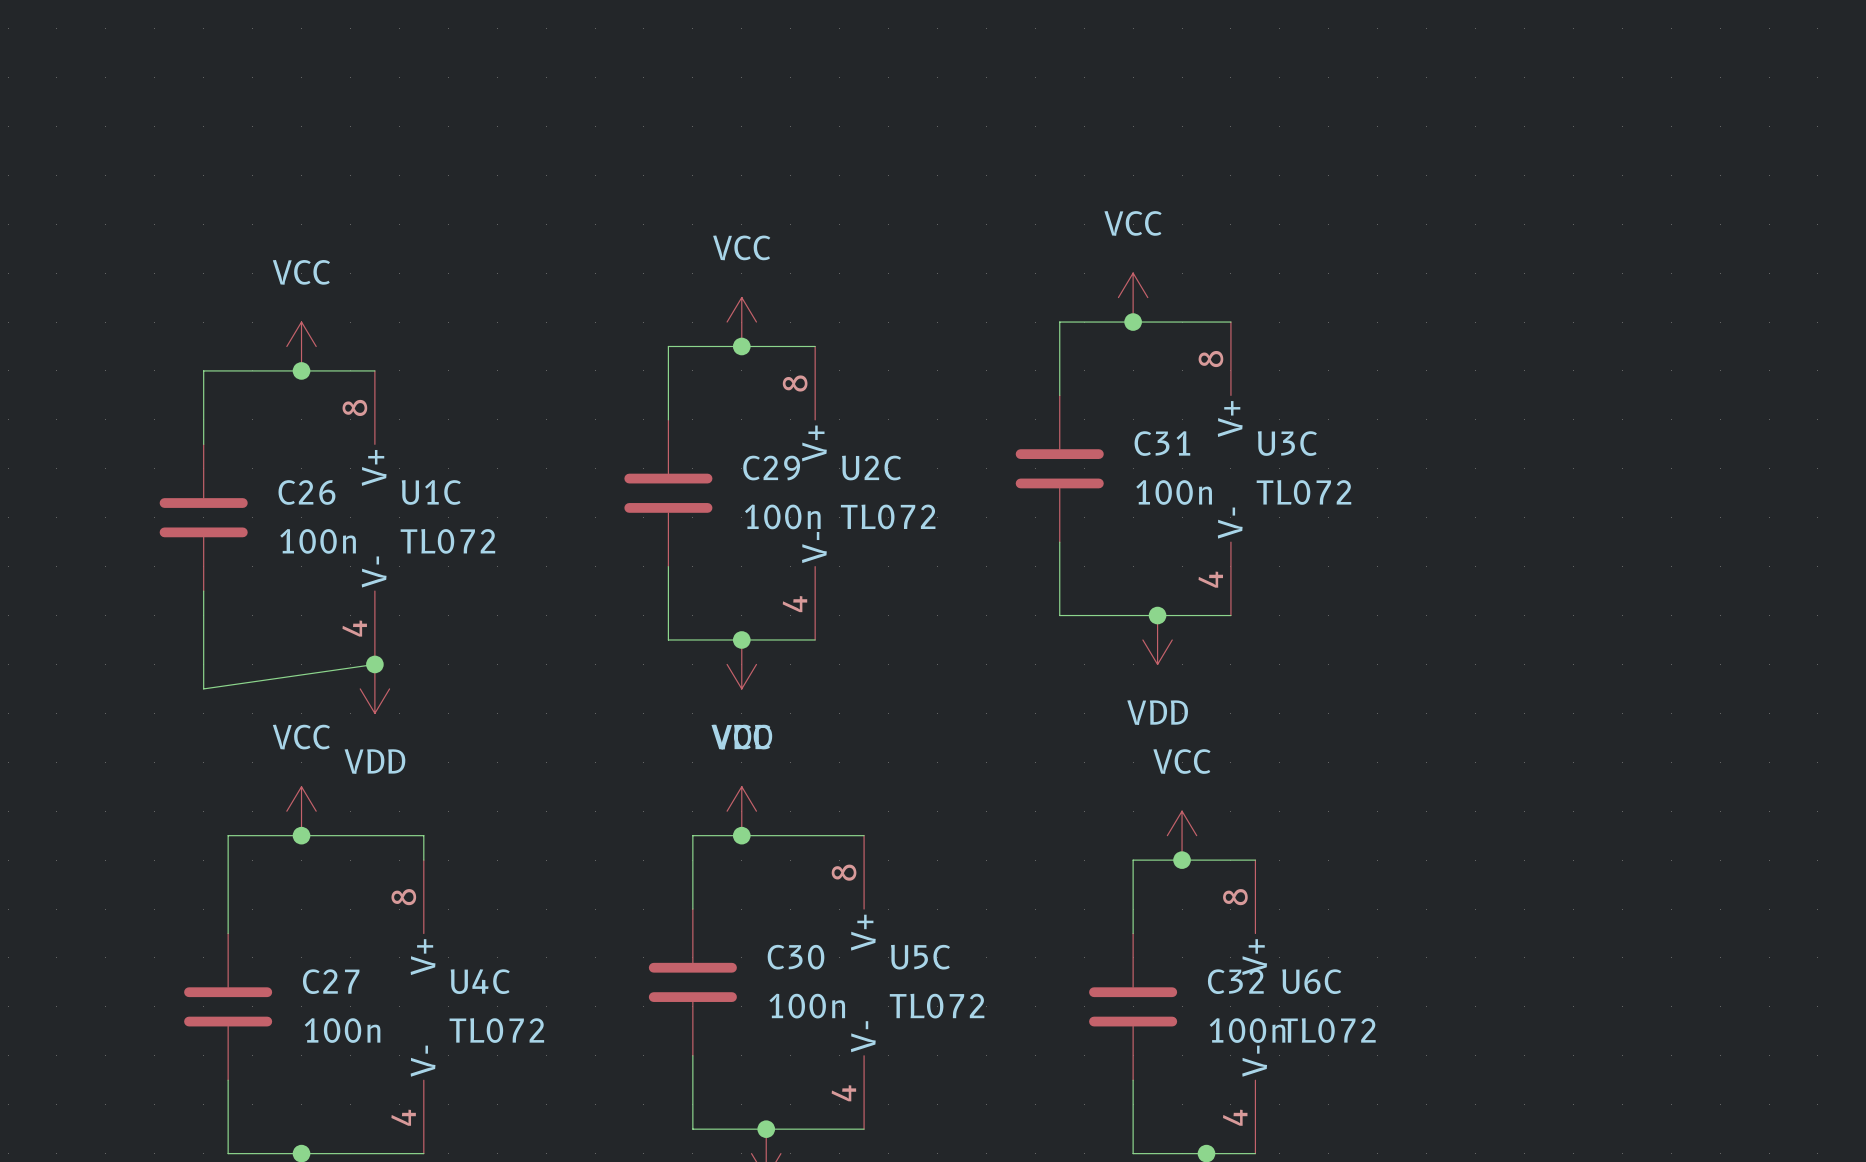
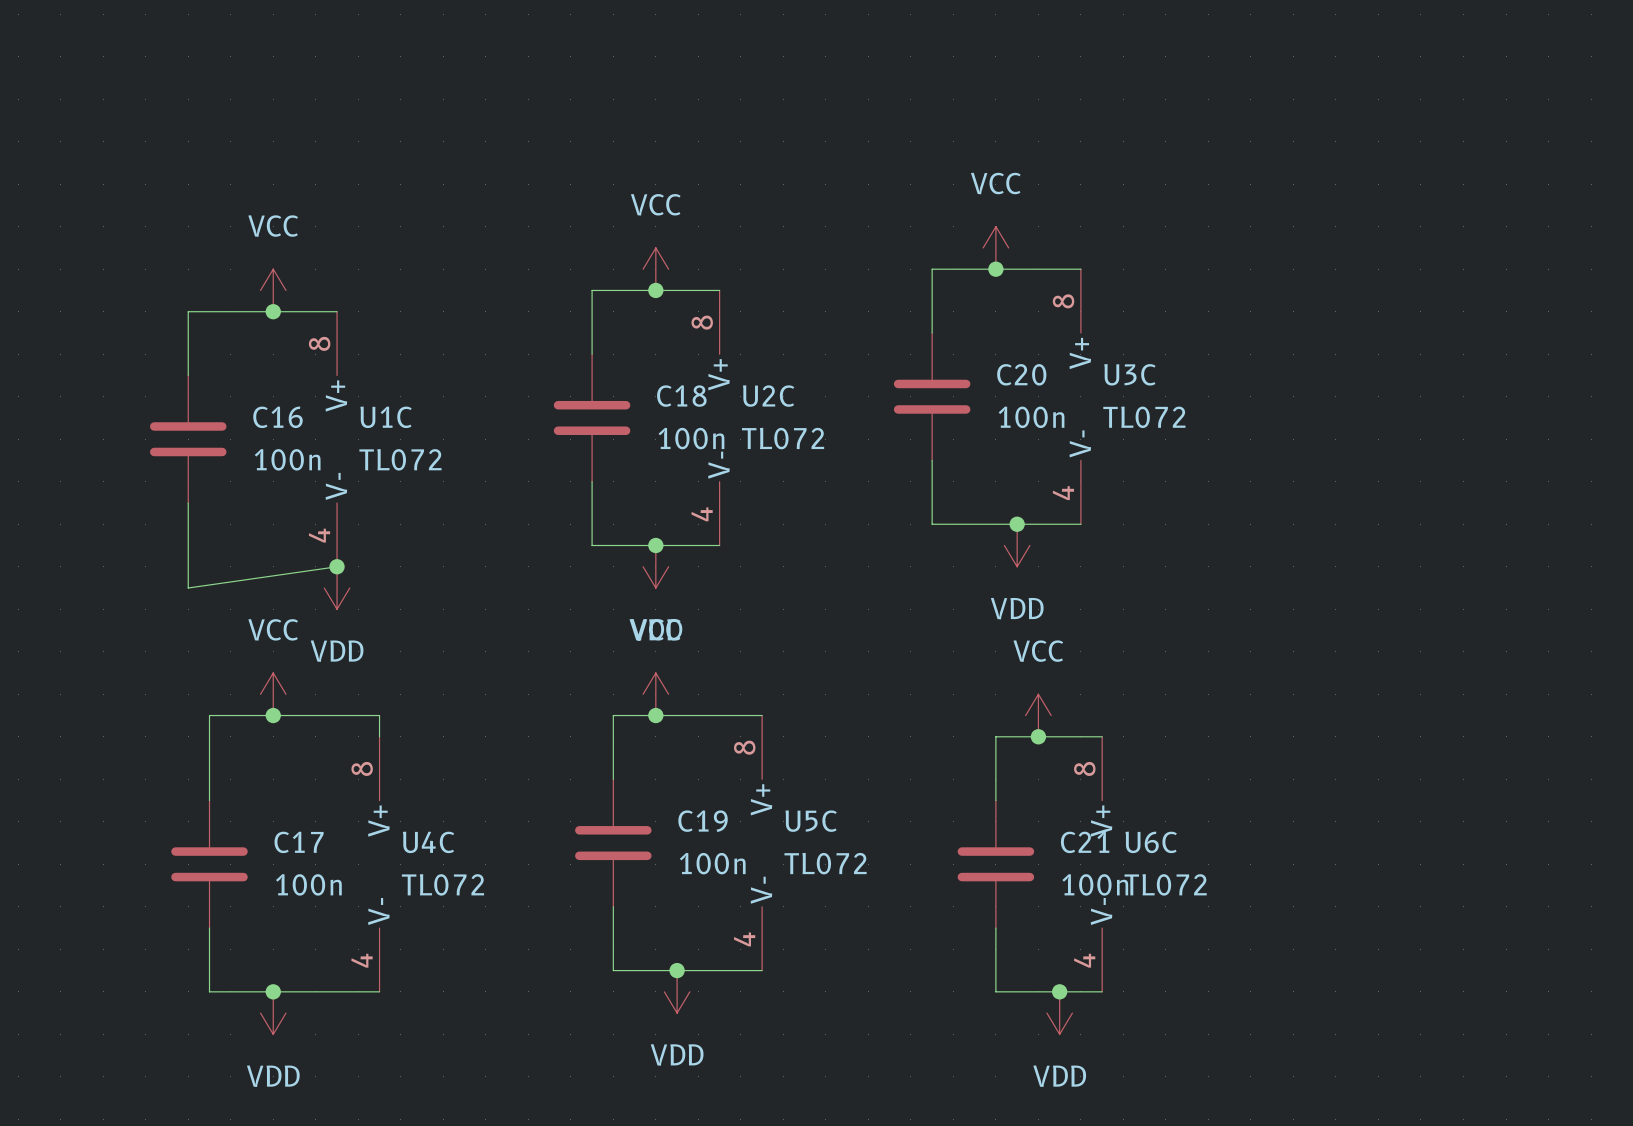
C31 name: C31 (1162, 443) -> C20 (1021, 374)
C29 name: C29 (771, 468) -> C18 (681, 396)
C26 name: C26 (306, 492) -> C16 (277, 417)
C30 name: C30 (795, 957) -> C19 (703, 821)
C27 name: C27 (331, 981) -> C17 (299, 842)
C32 name: C32 (1235, 981) -> C21 (1085, 842)

